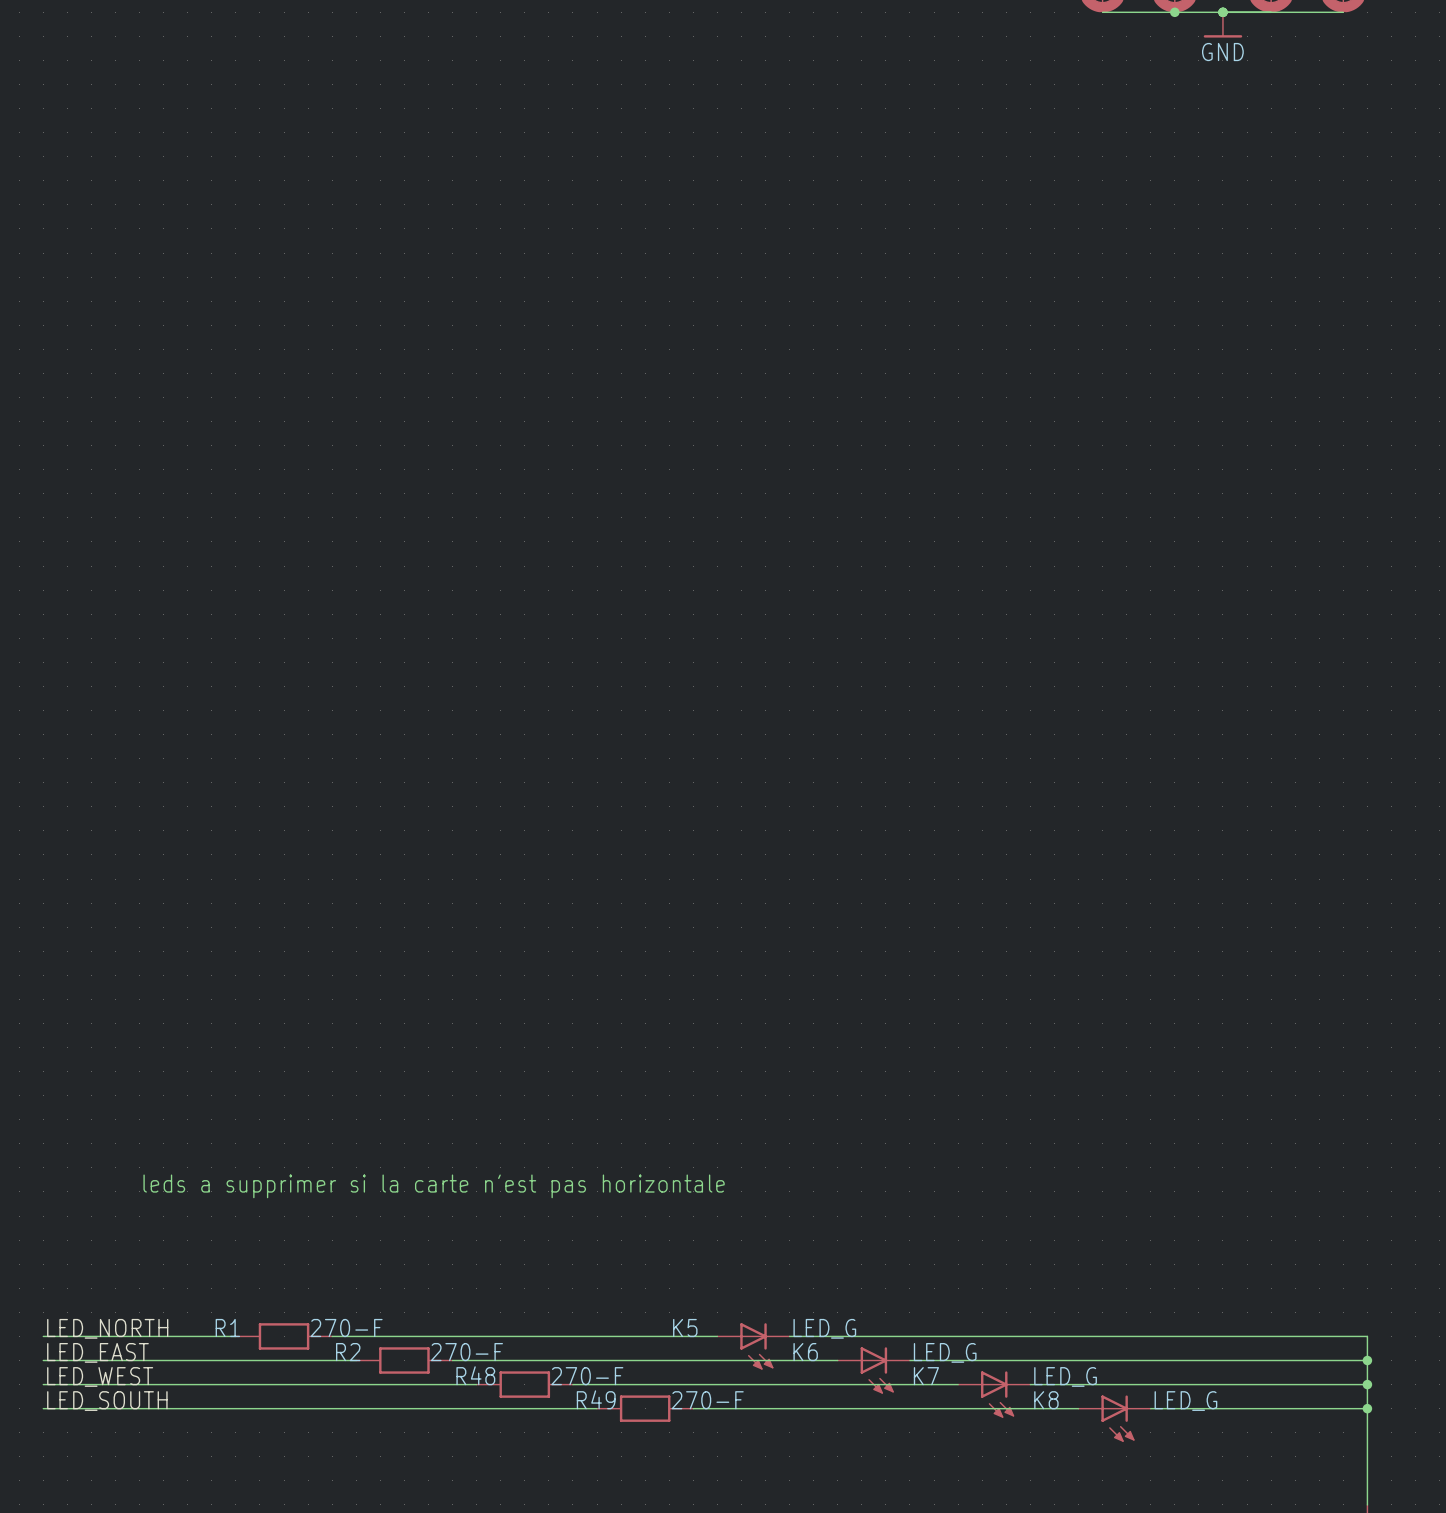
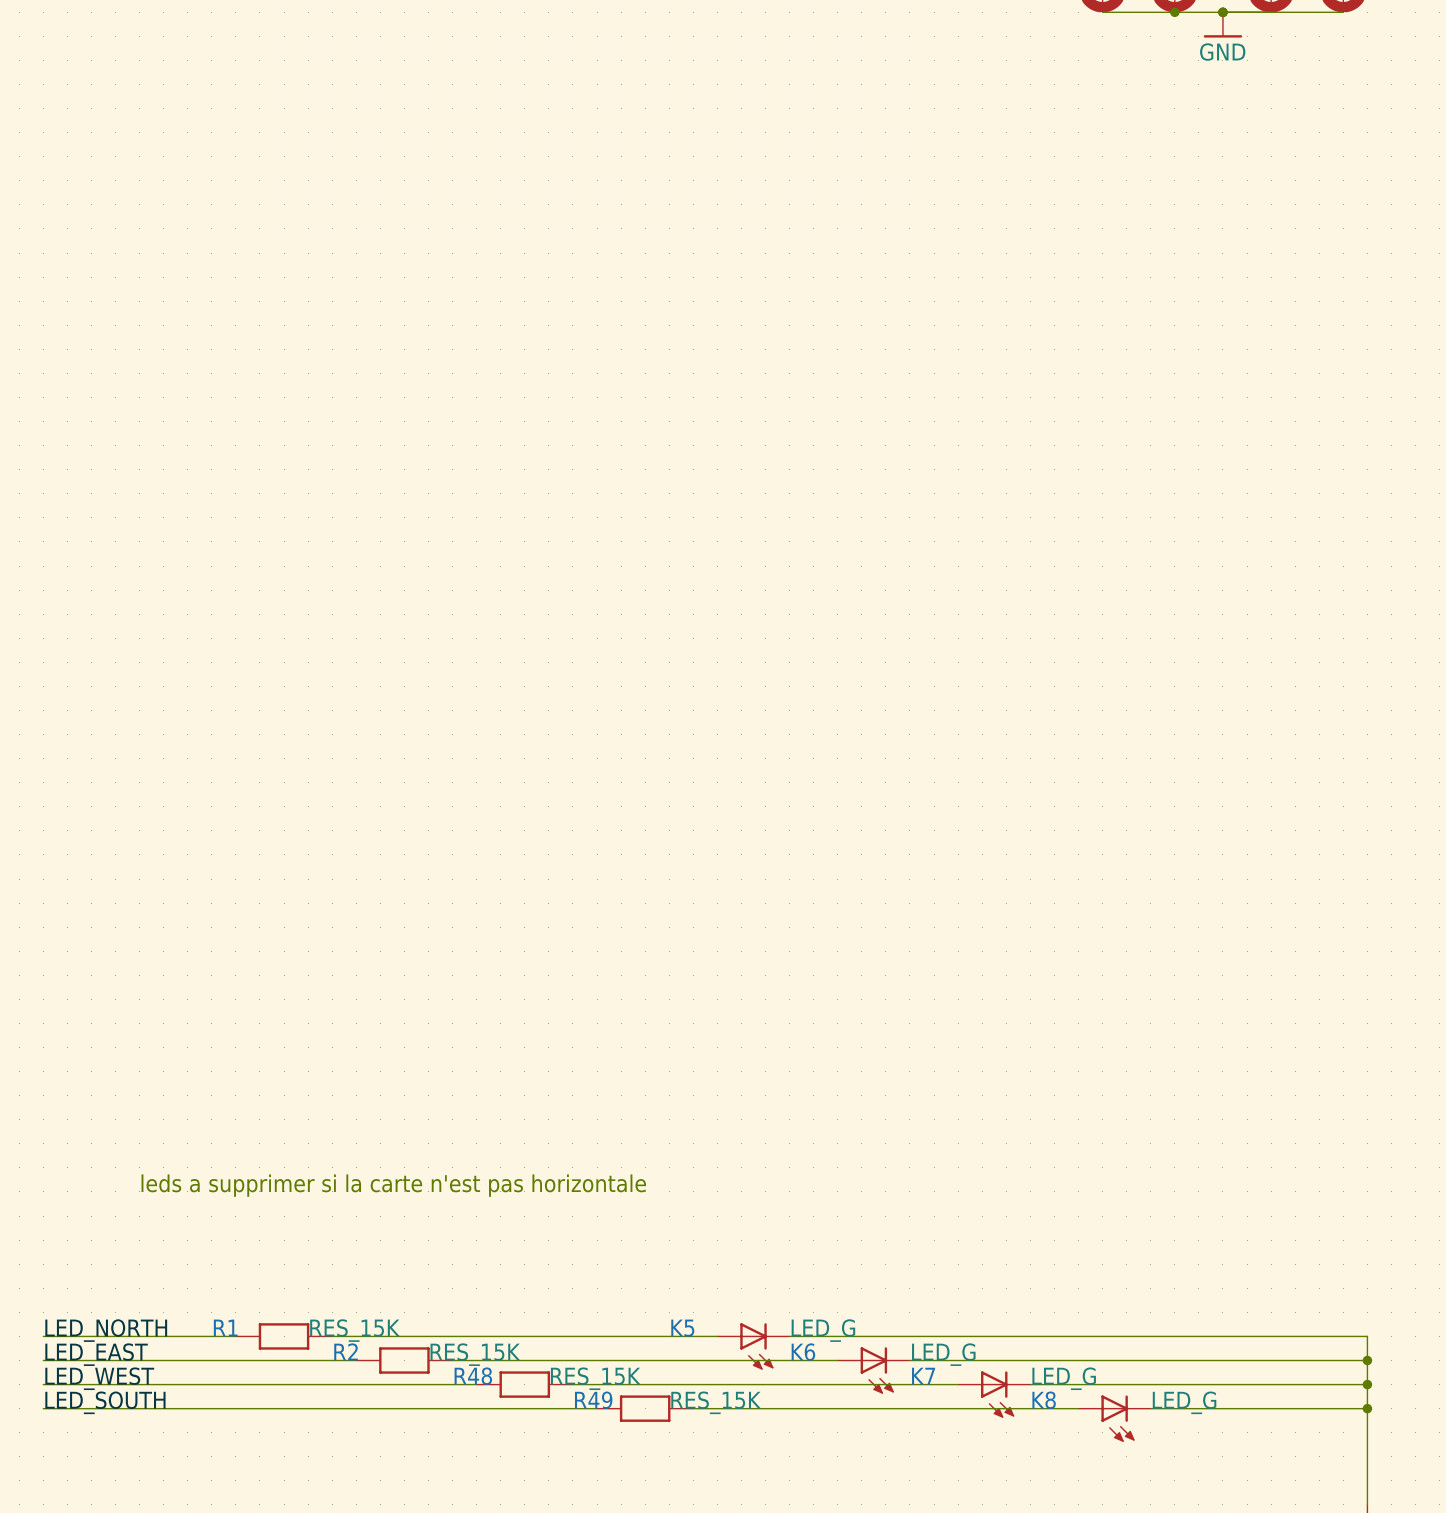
R1 value: 270-F (346, 1328) -> RES_15K (355, 1330)
R2 value: 270-F (466, 1352) -> RES_15K (475, 1354)
R48 value: 270-F (587, 1376) -> RES_15K (595, 1378)
R49 value: 270-F (707, 1400) -> RES_15K (716, 1402)

